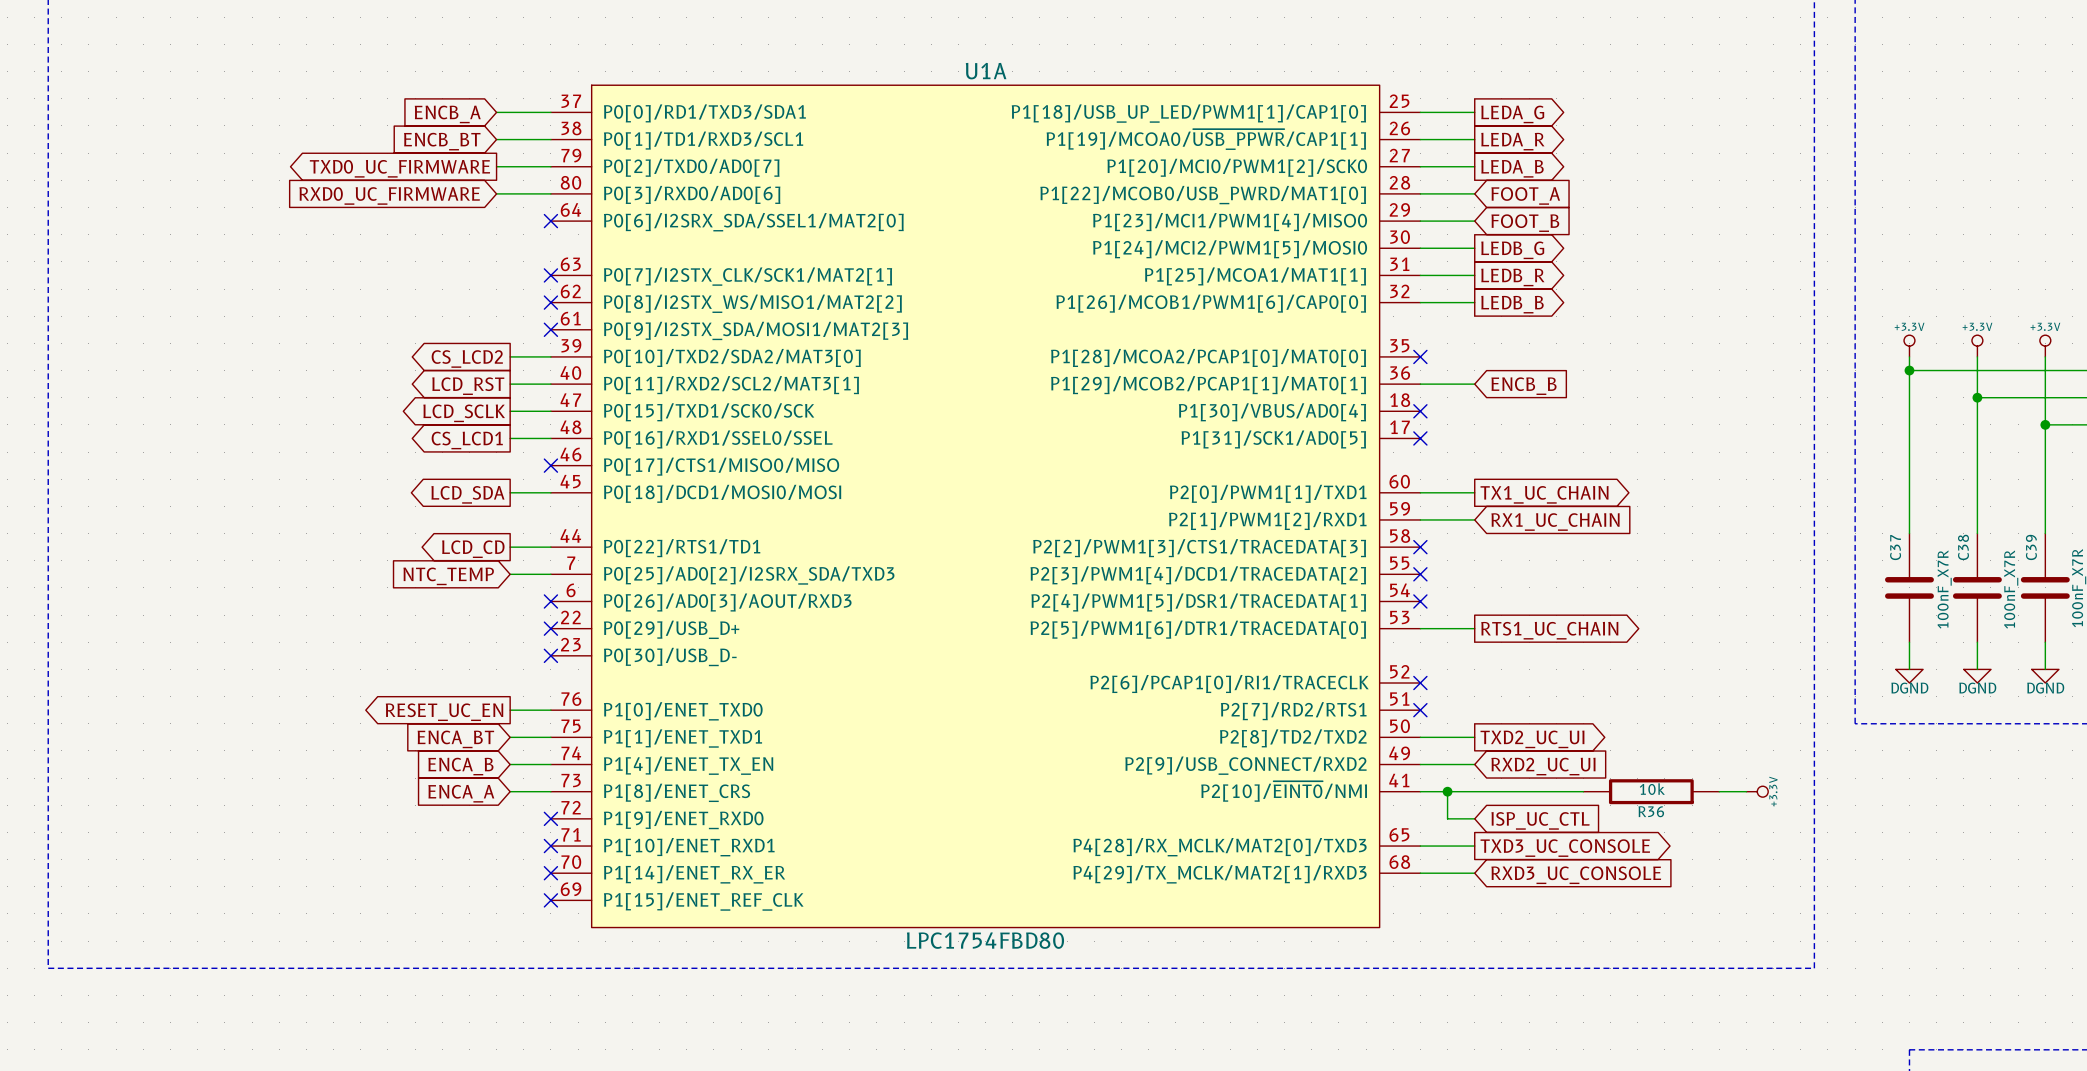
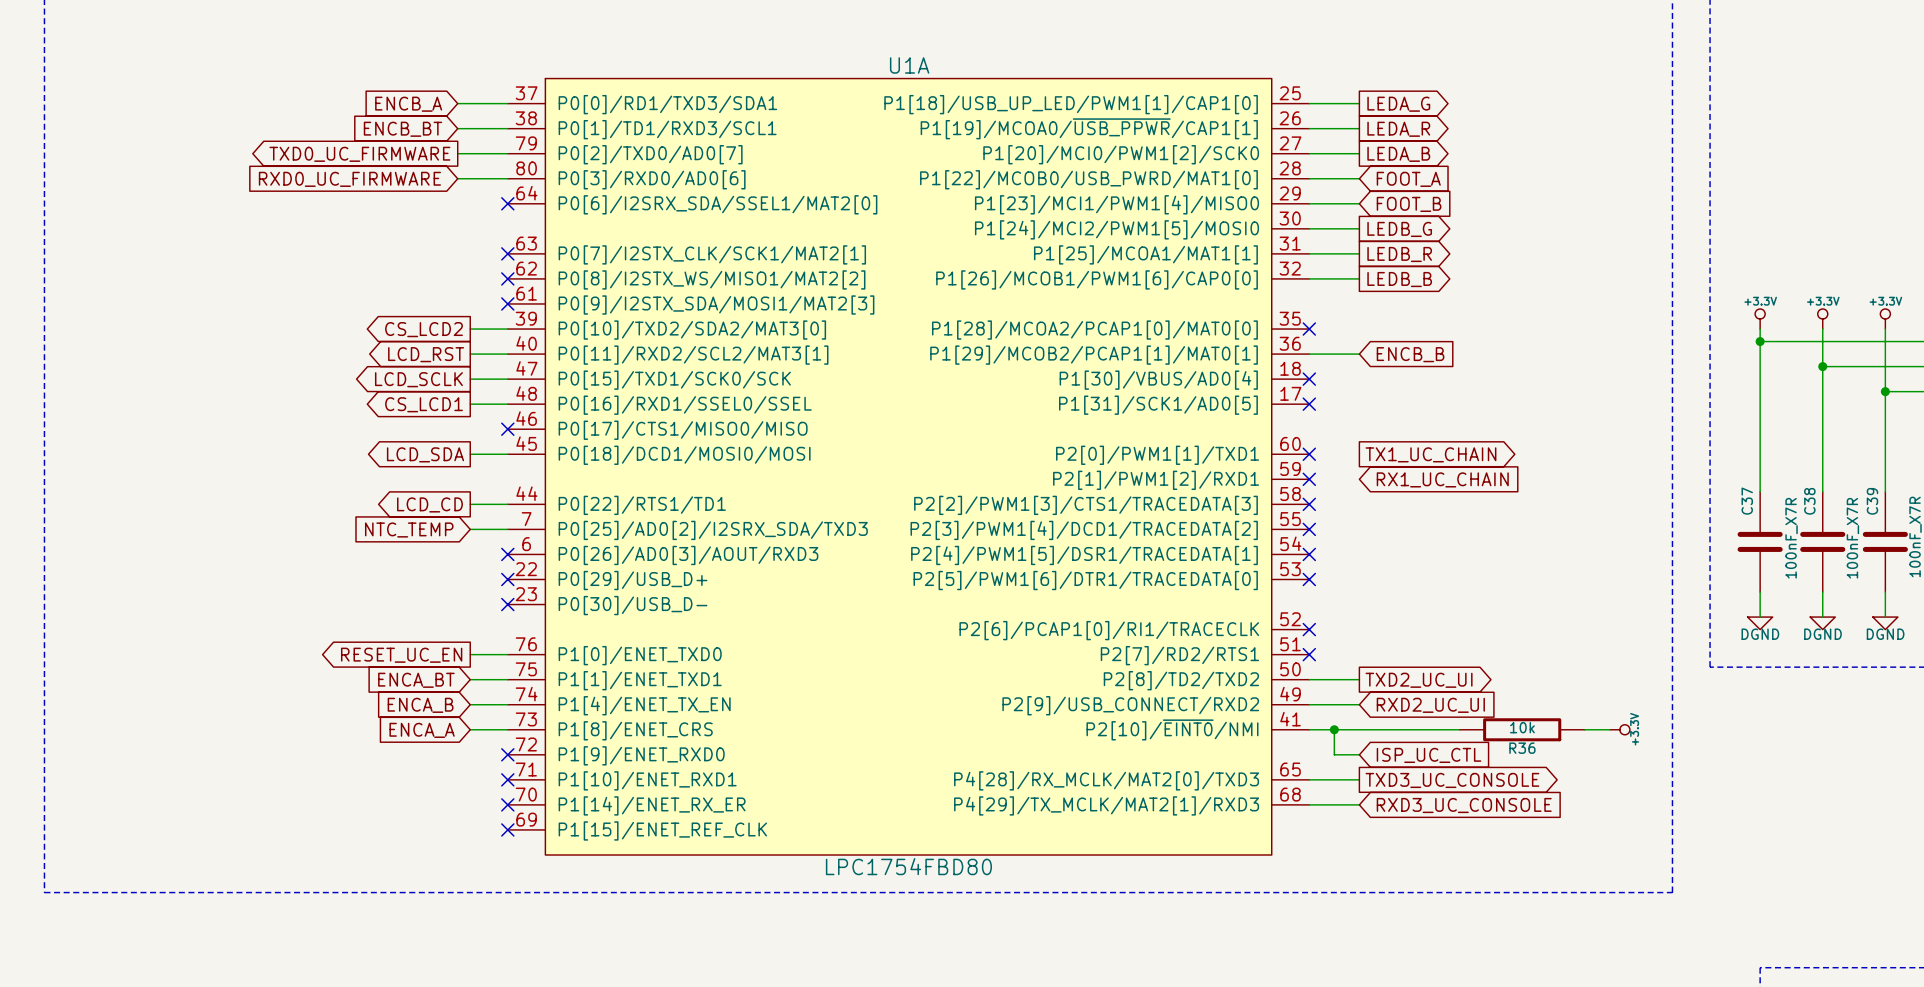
wire: (1420, 492) (1474, 492) -> none
no-connect mark: none -> (1309, 454)
wire: (1420, 519) (1474, 519) -> none
no-connect mark: none -> (1309, 479)
wire: (1420, 628) (1474, 628) -> none
no-connect mark: none -> (1309, 579)
global label: RTS1_UC_CHAIN (1549, 630) -> none

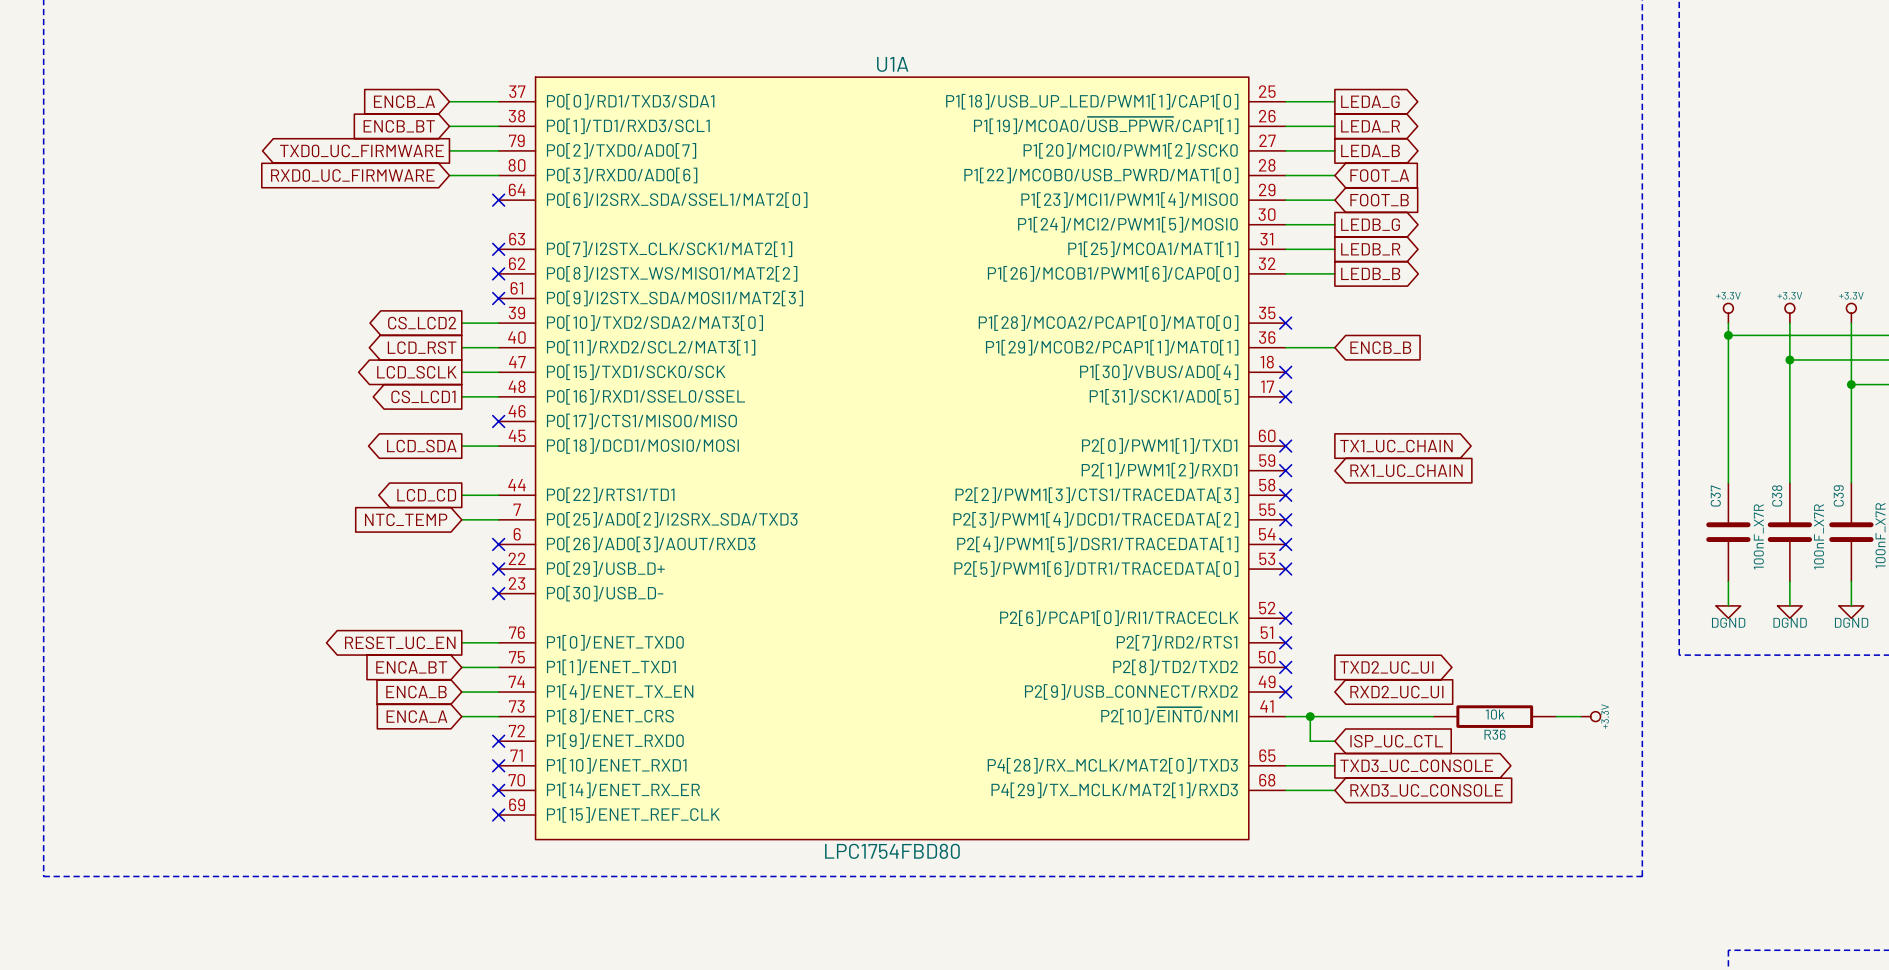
wire: (1309, 679) (1359, 679) -> none
no-connect mark: none -> (1285, 667)
wire: (1309, 704) (1359, 704) -> none
no-connect mark: none -> (1285, 692)

